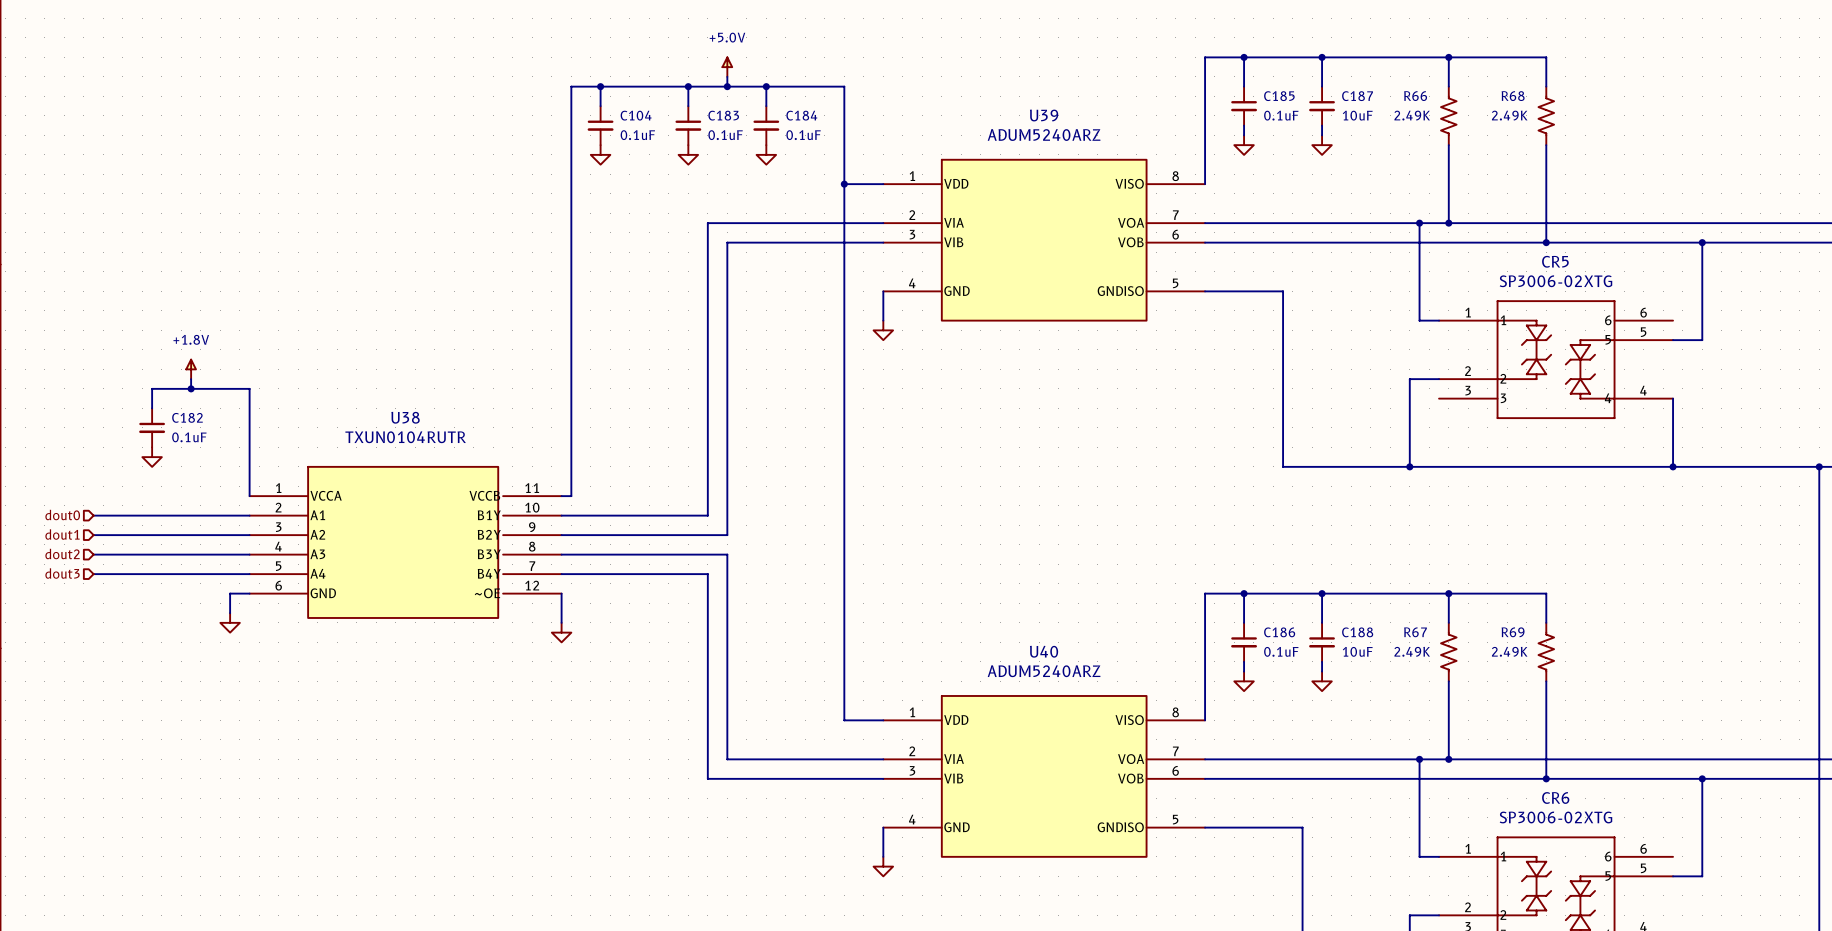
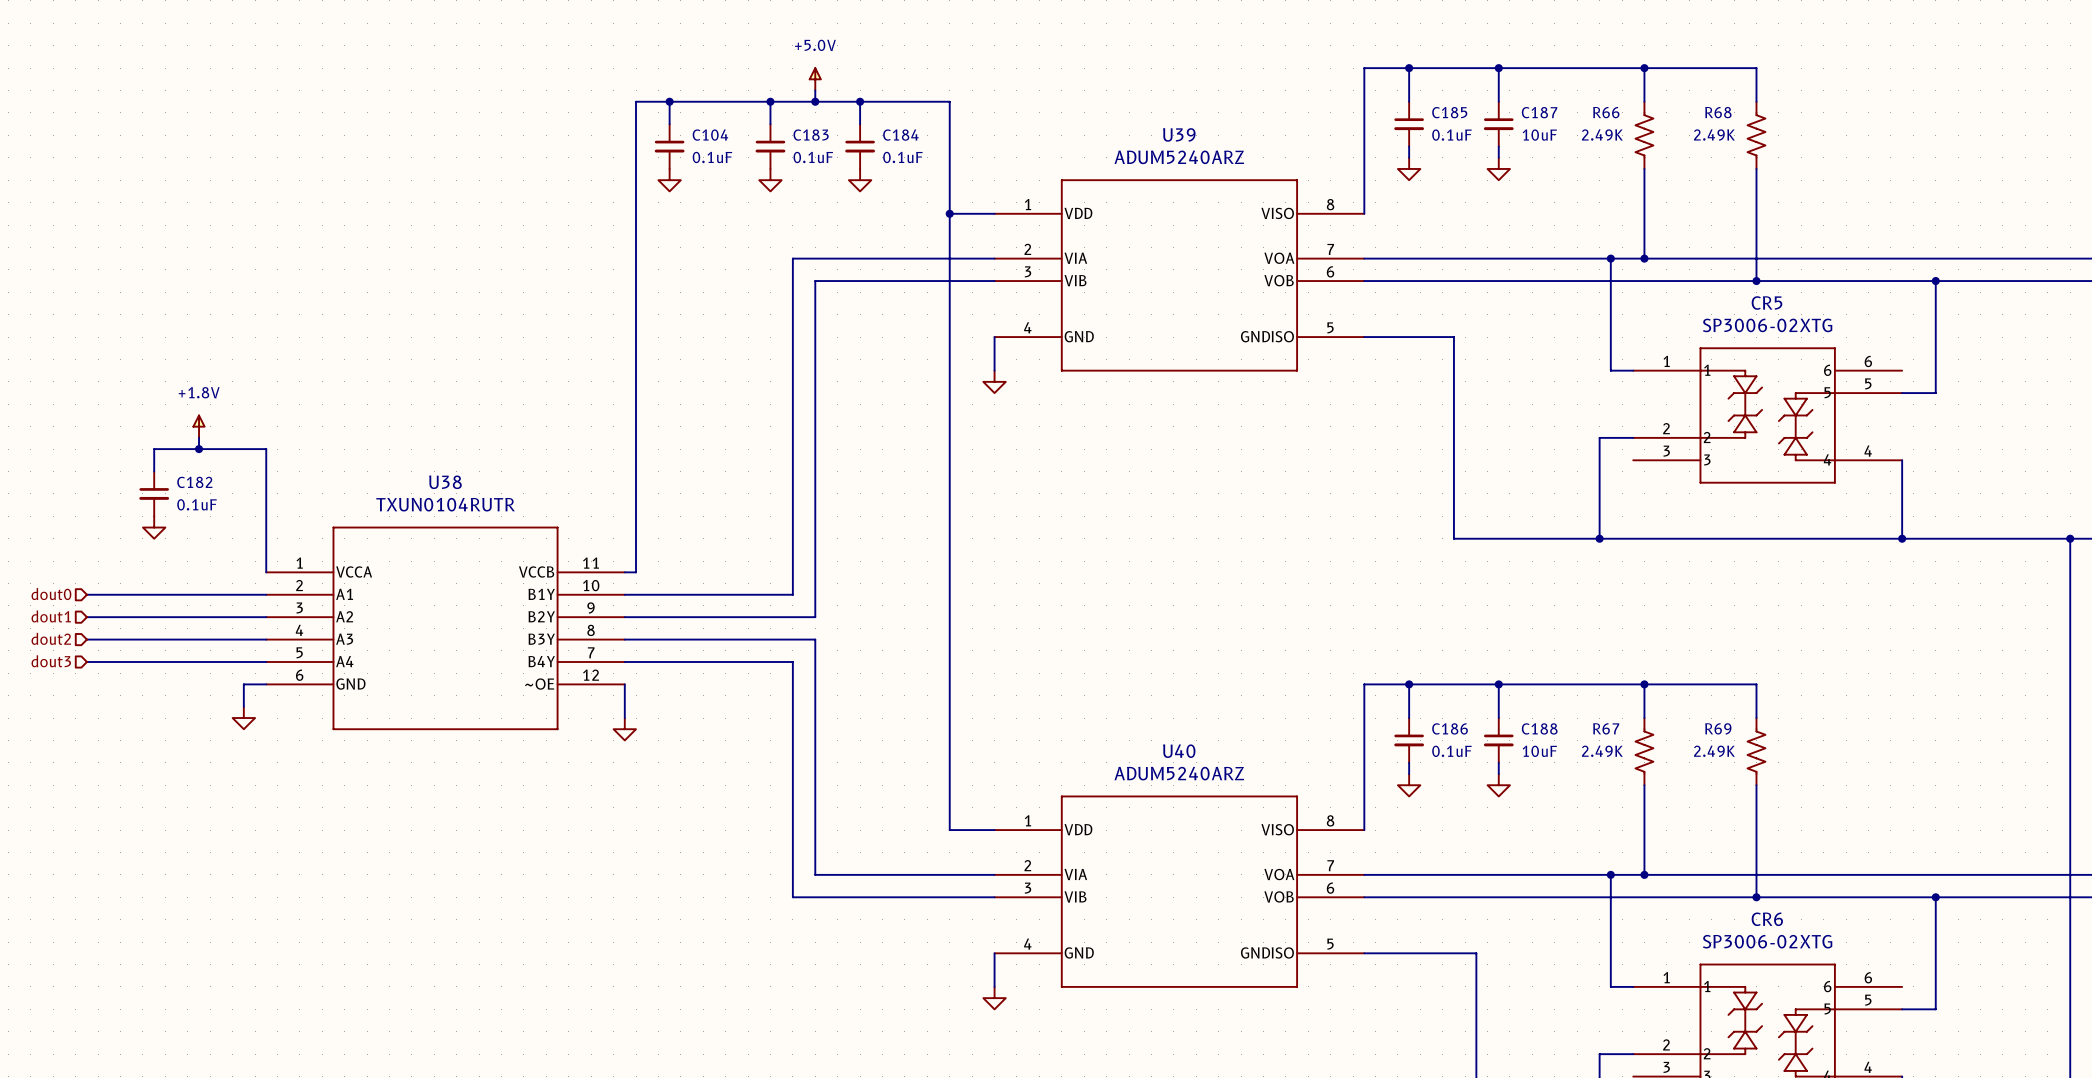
U39 symbol: [883, 159, 1206, 321] -> [994, 179, 1365, 372]
U38 symbol: [249, 466, 562, 618] -> [266, 526, 625, 730]
U40 symbol: [883, 695, 1206, 857] -> [994, 795, 1365, 988]

